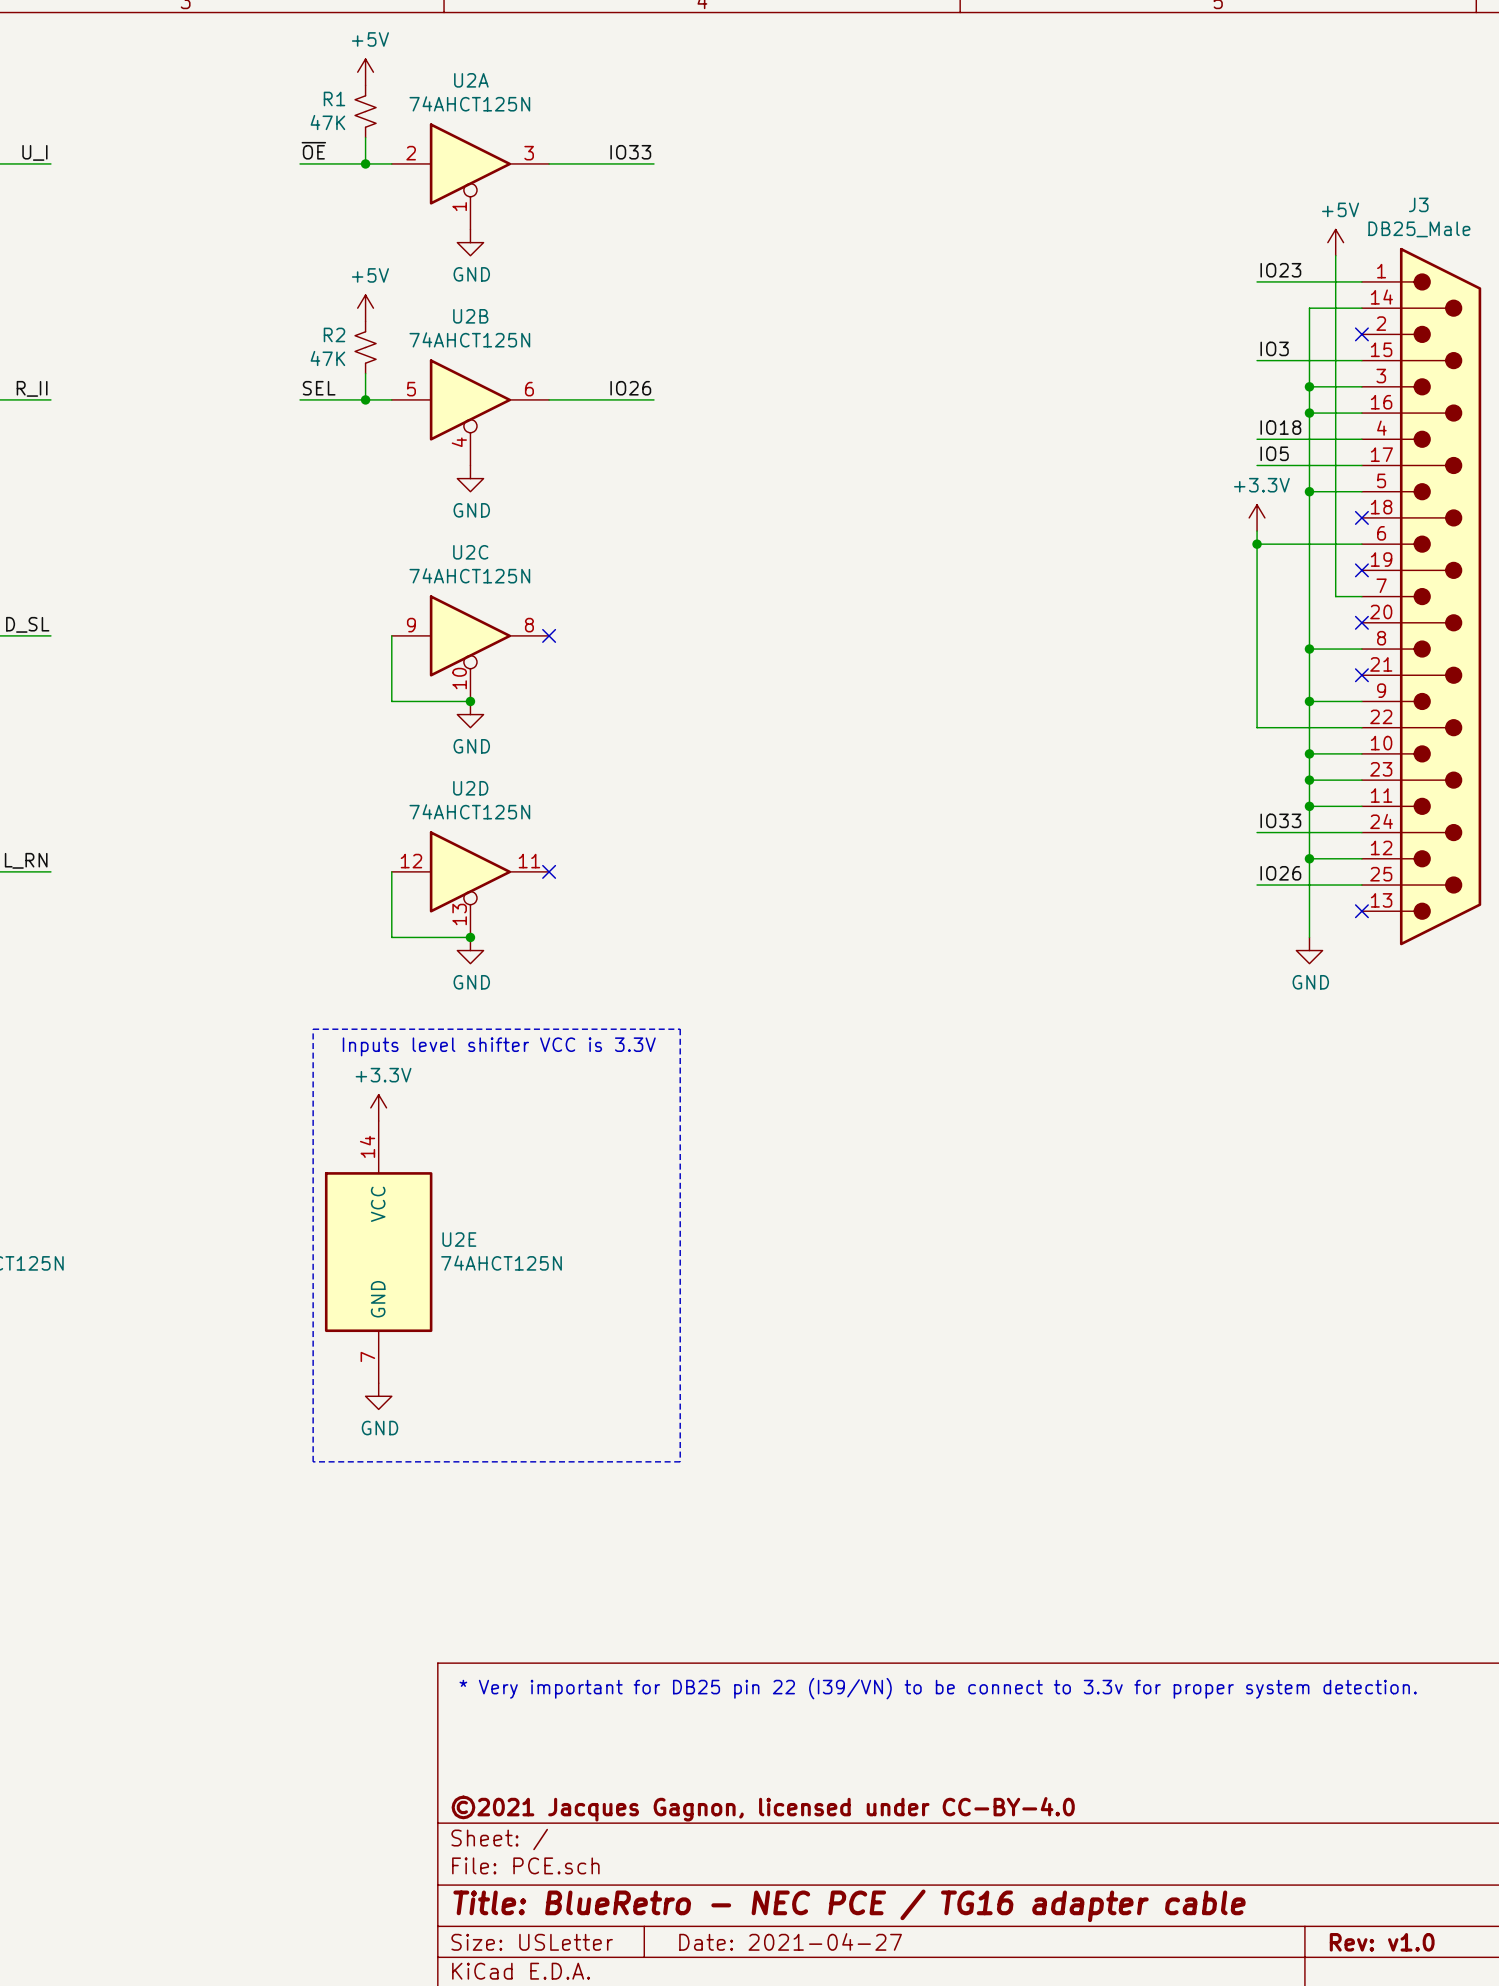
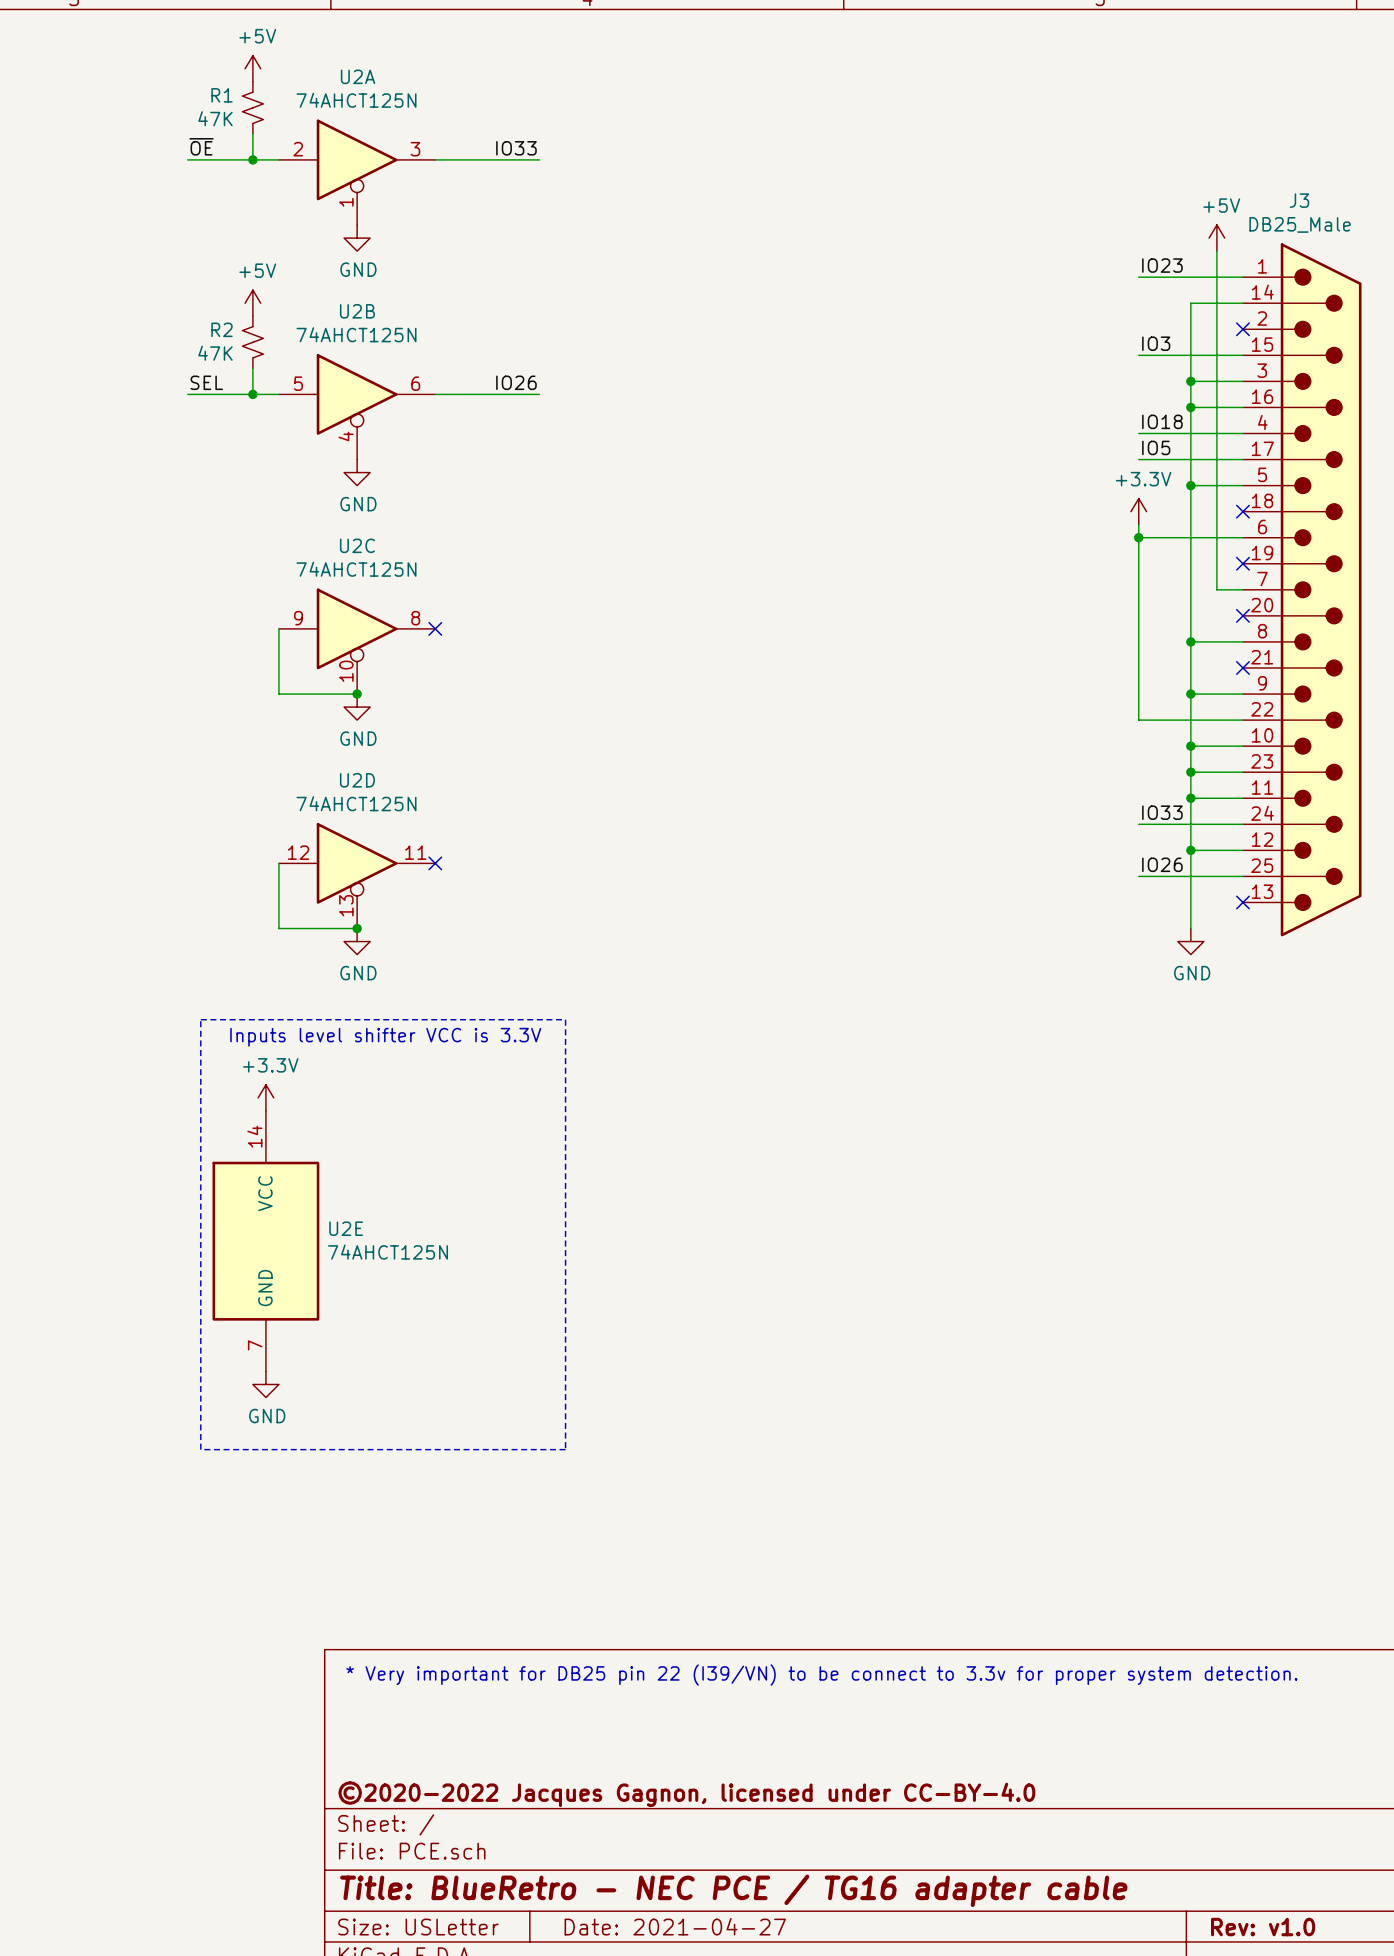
title block: ©2021 Jacques Gagnon, licensed under CC-BY-4.0 (763, 1808) -> ©2020-2022 Jacques Gagnon, licensed under CC-BY-4.0 (686, 1794)

